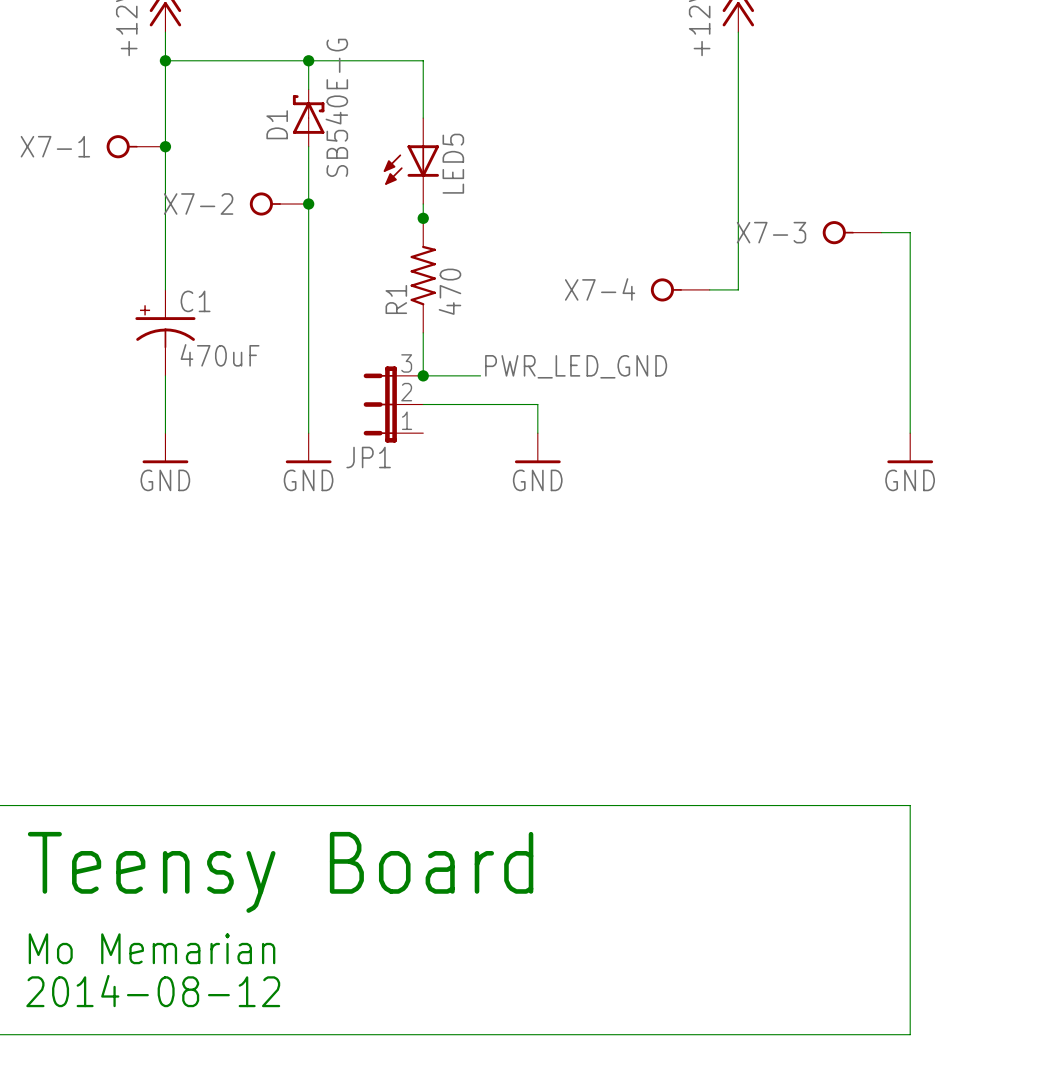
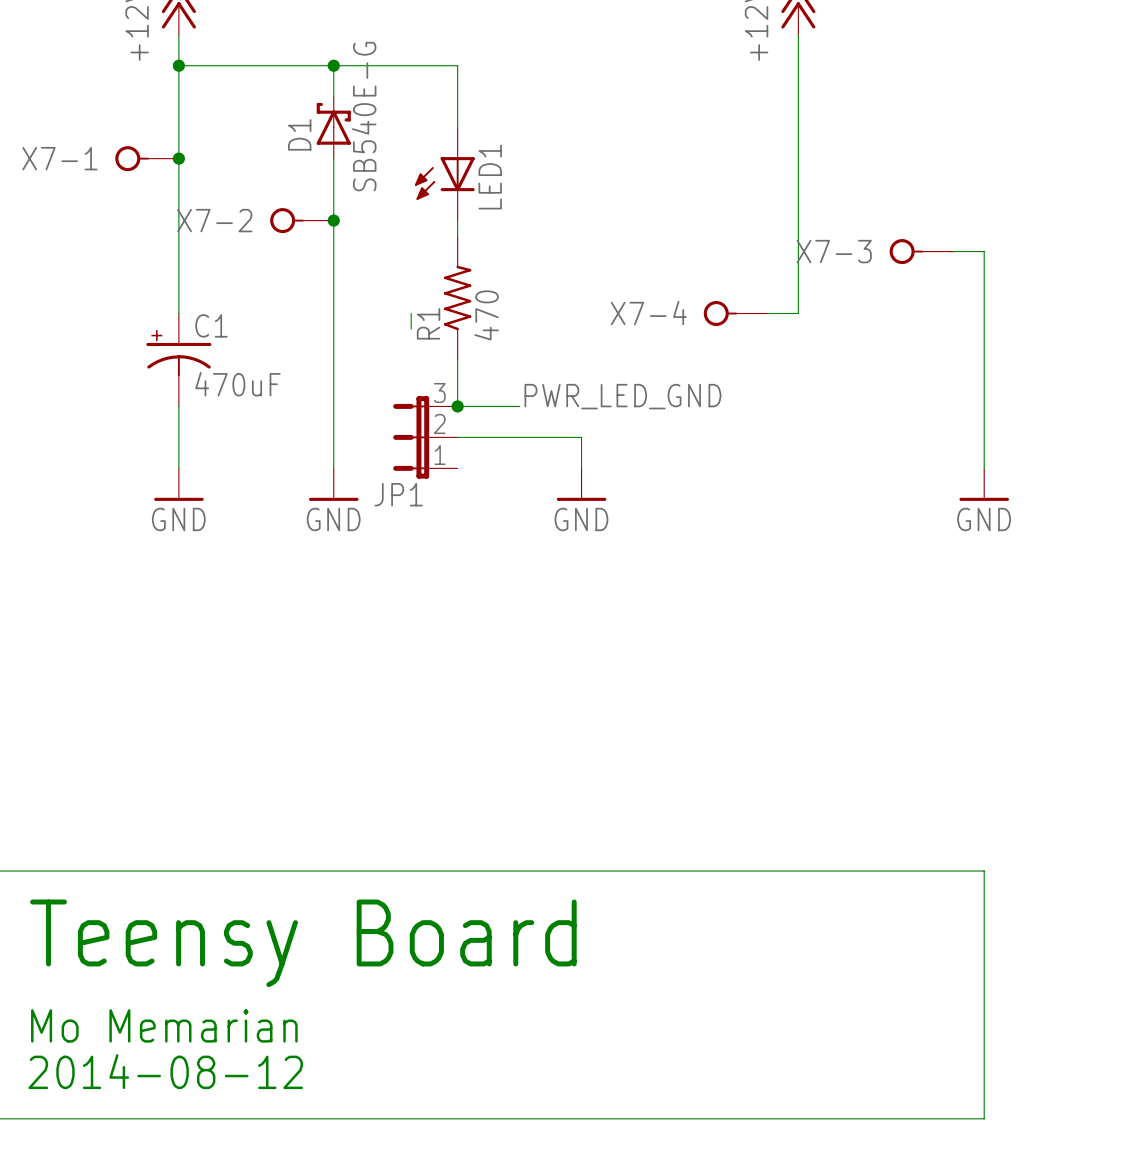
LED5 name: LED5 (453, 163) -> LED1 (490, 177)
junction: (423, 218) -> none
wire: none -> (411, 313) (411, 328)

